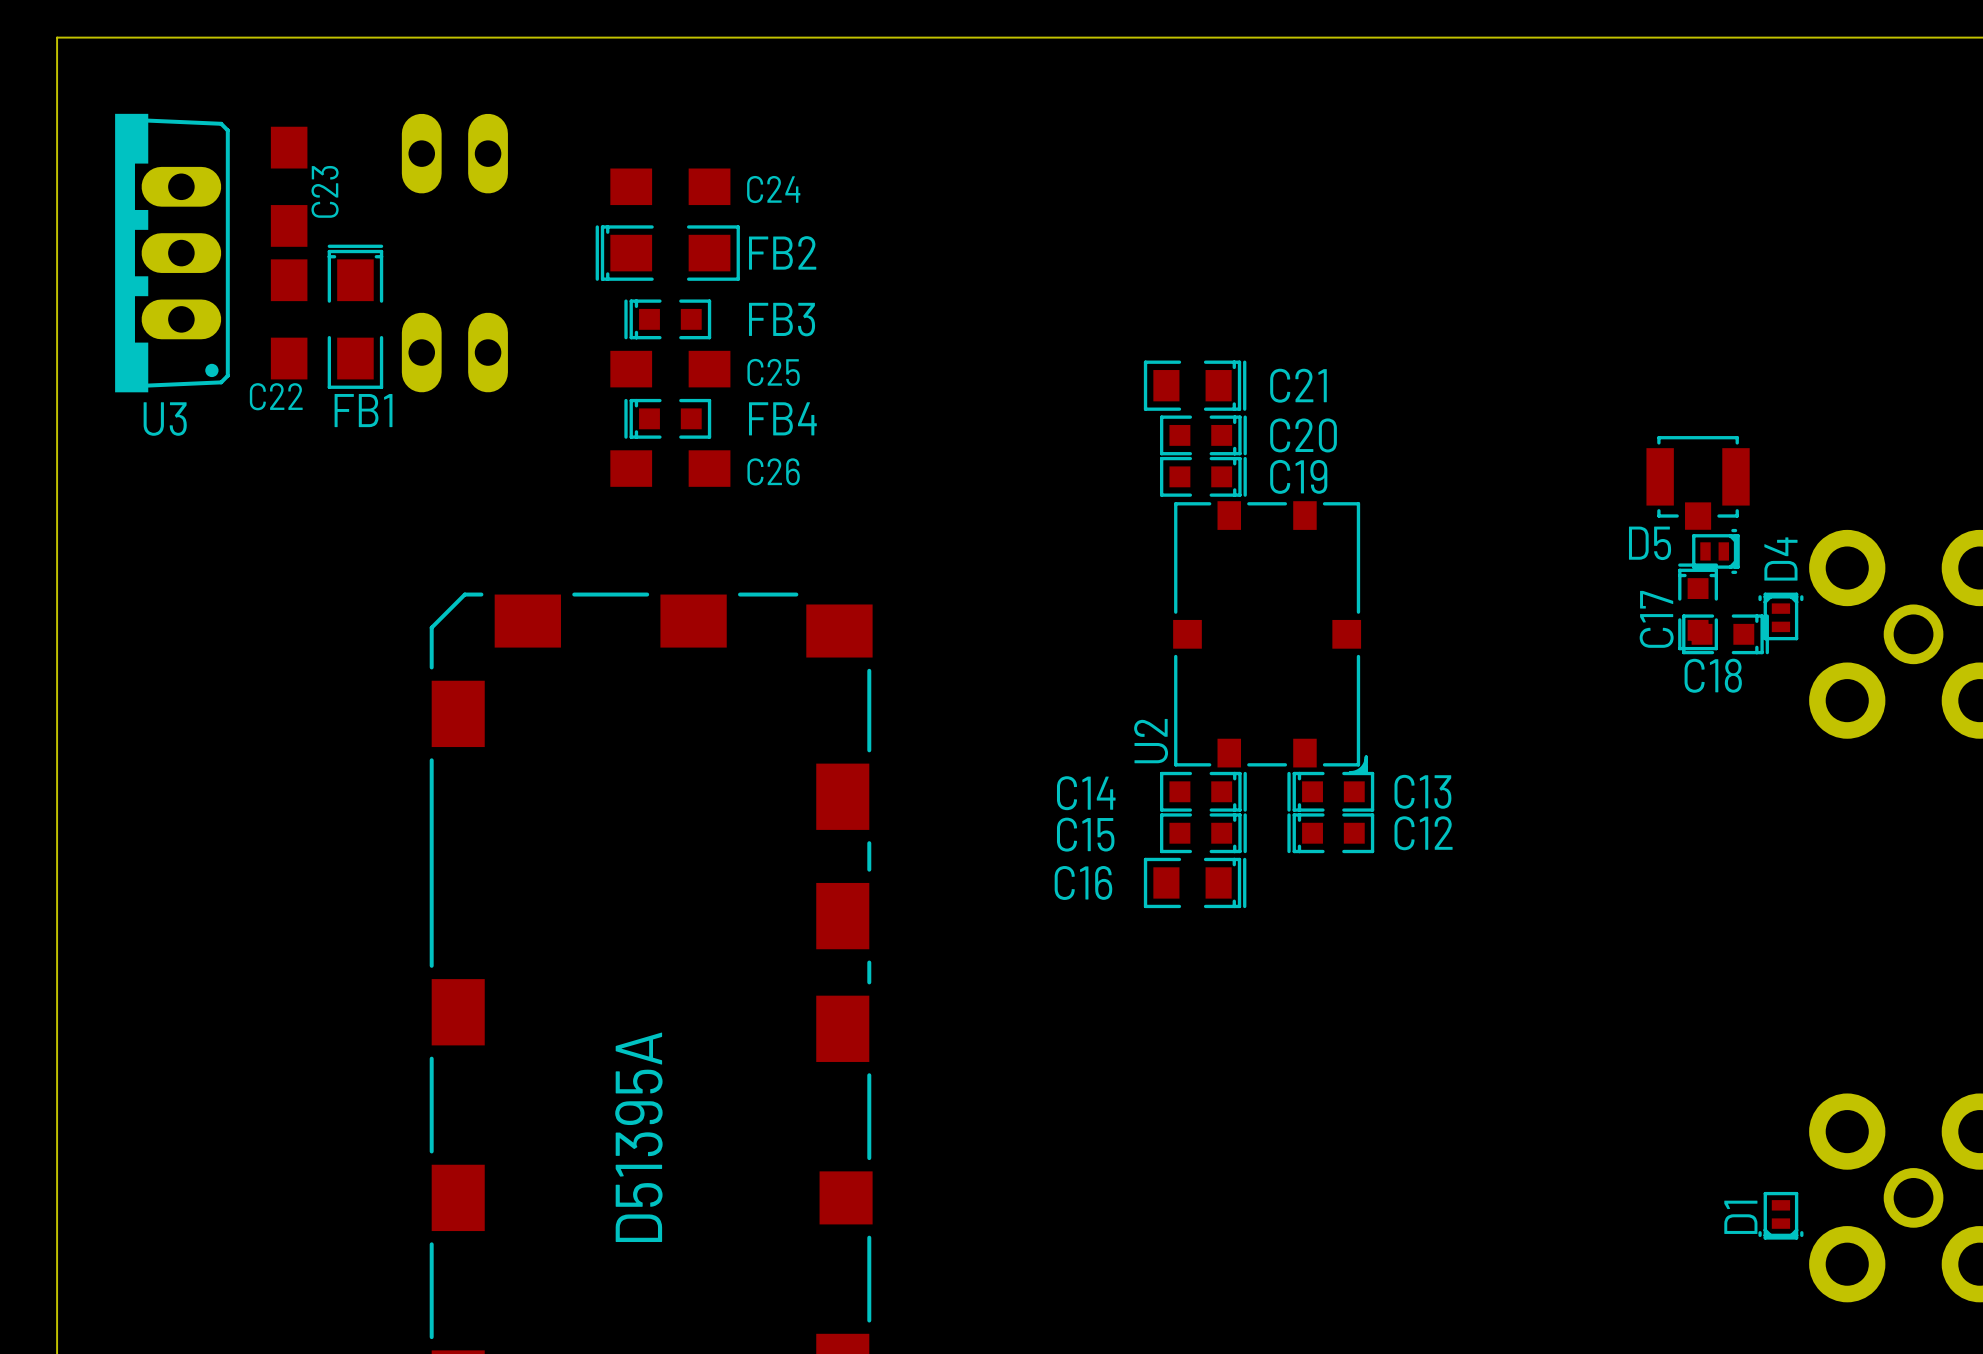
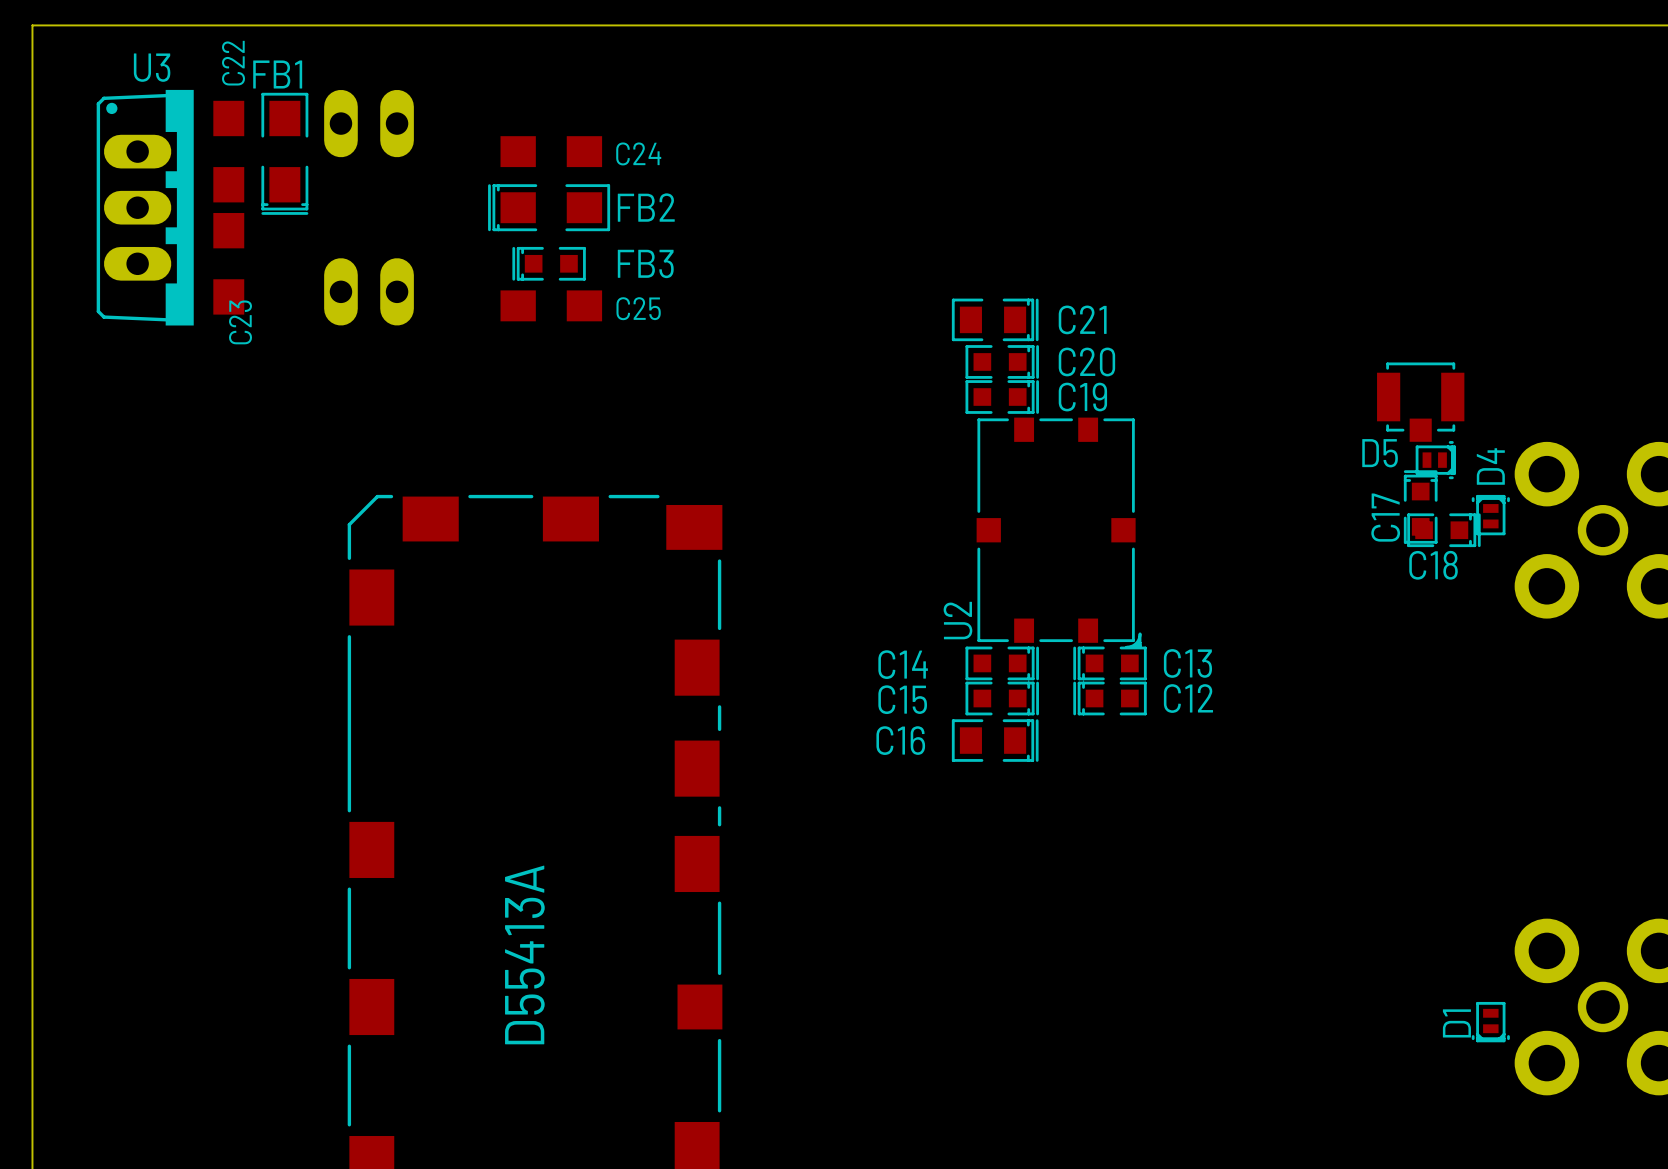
C23 name: C23 (325, 191) -> C22 (233, 63)
U3 rotation: 0° (172, 253) -> 180° (145, 207)
FB1 rotation: 0° (355, 316) -> 180° (284, 153)
FB1 position: (355, 316) -> (284, 153)
C22 name: C22 (276, 396) -> C23 (240, 322)
FB4: (667, 418) -> none
C26: (670, 468) -> none
text: D51395A (638, 1137) -> D55413A (524, 954)

